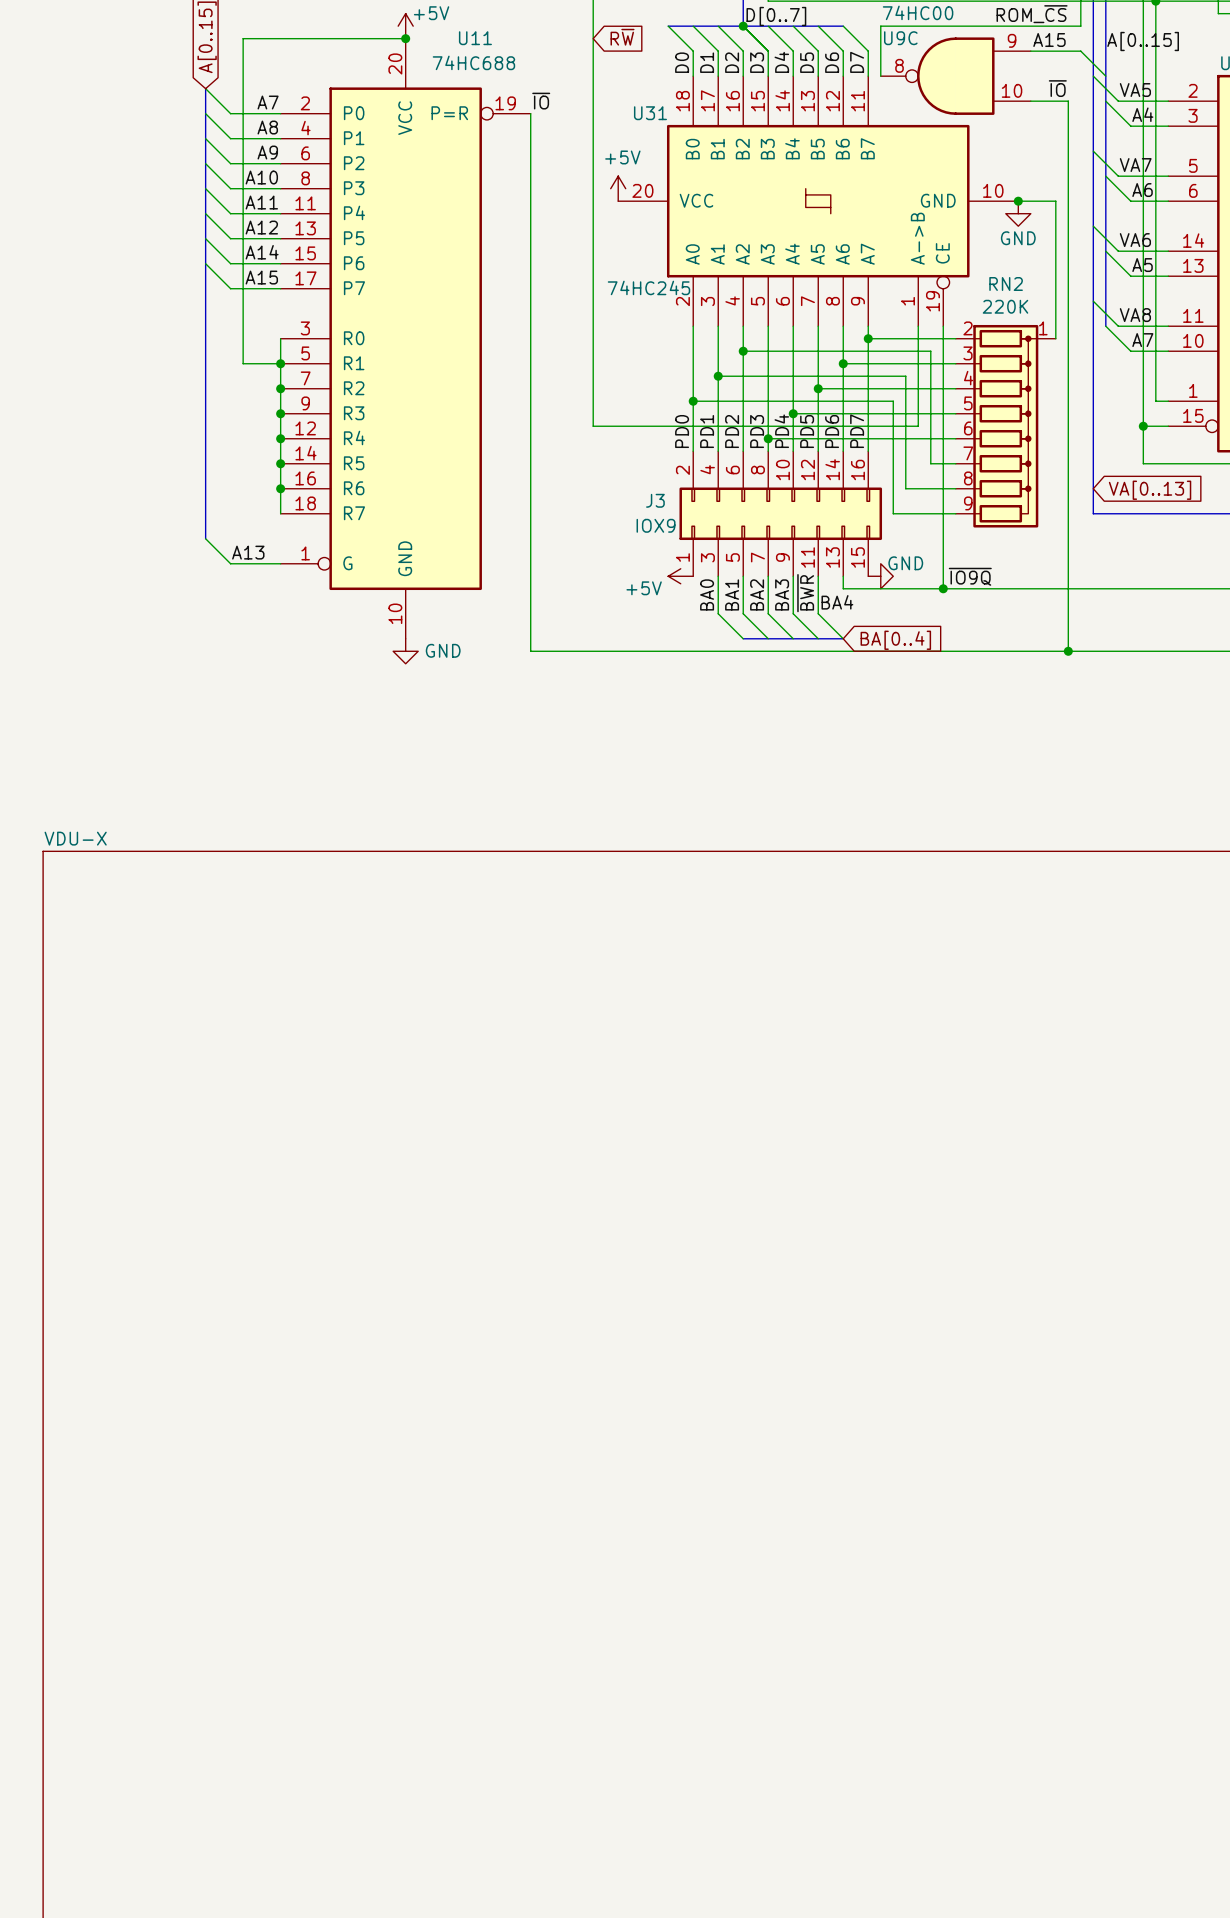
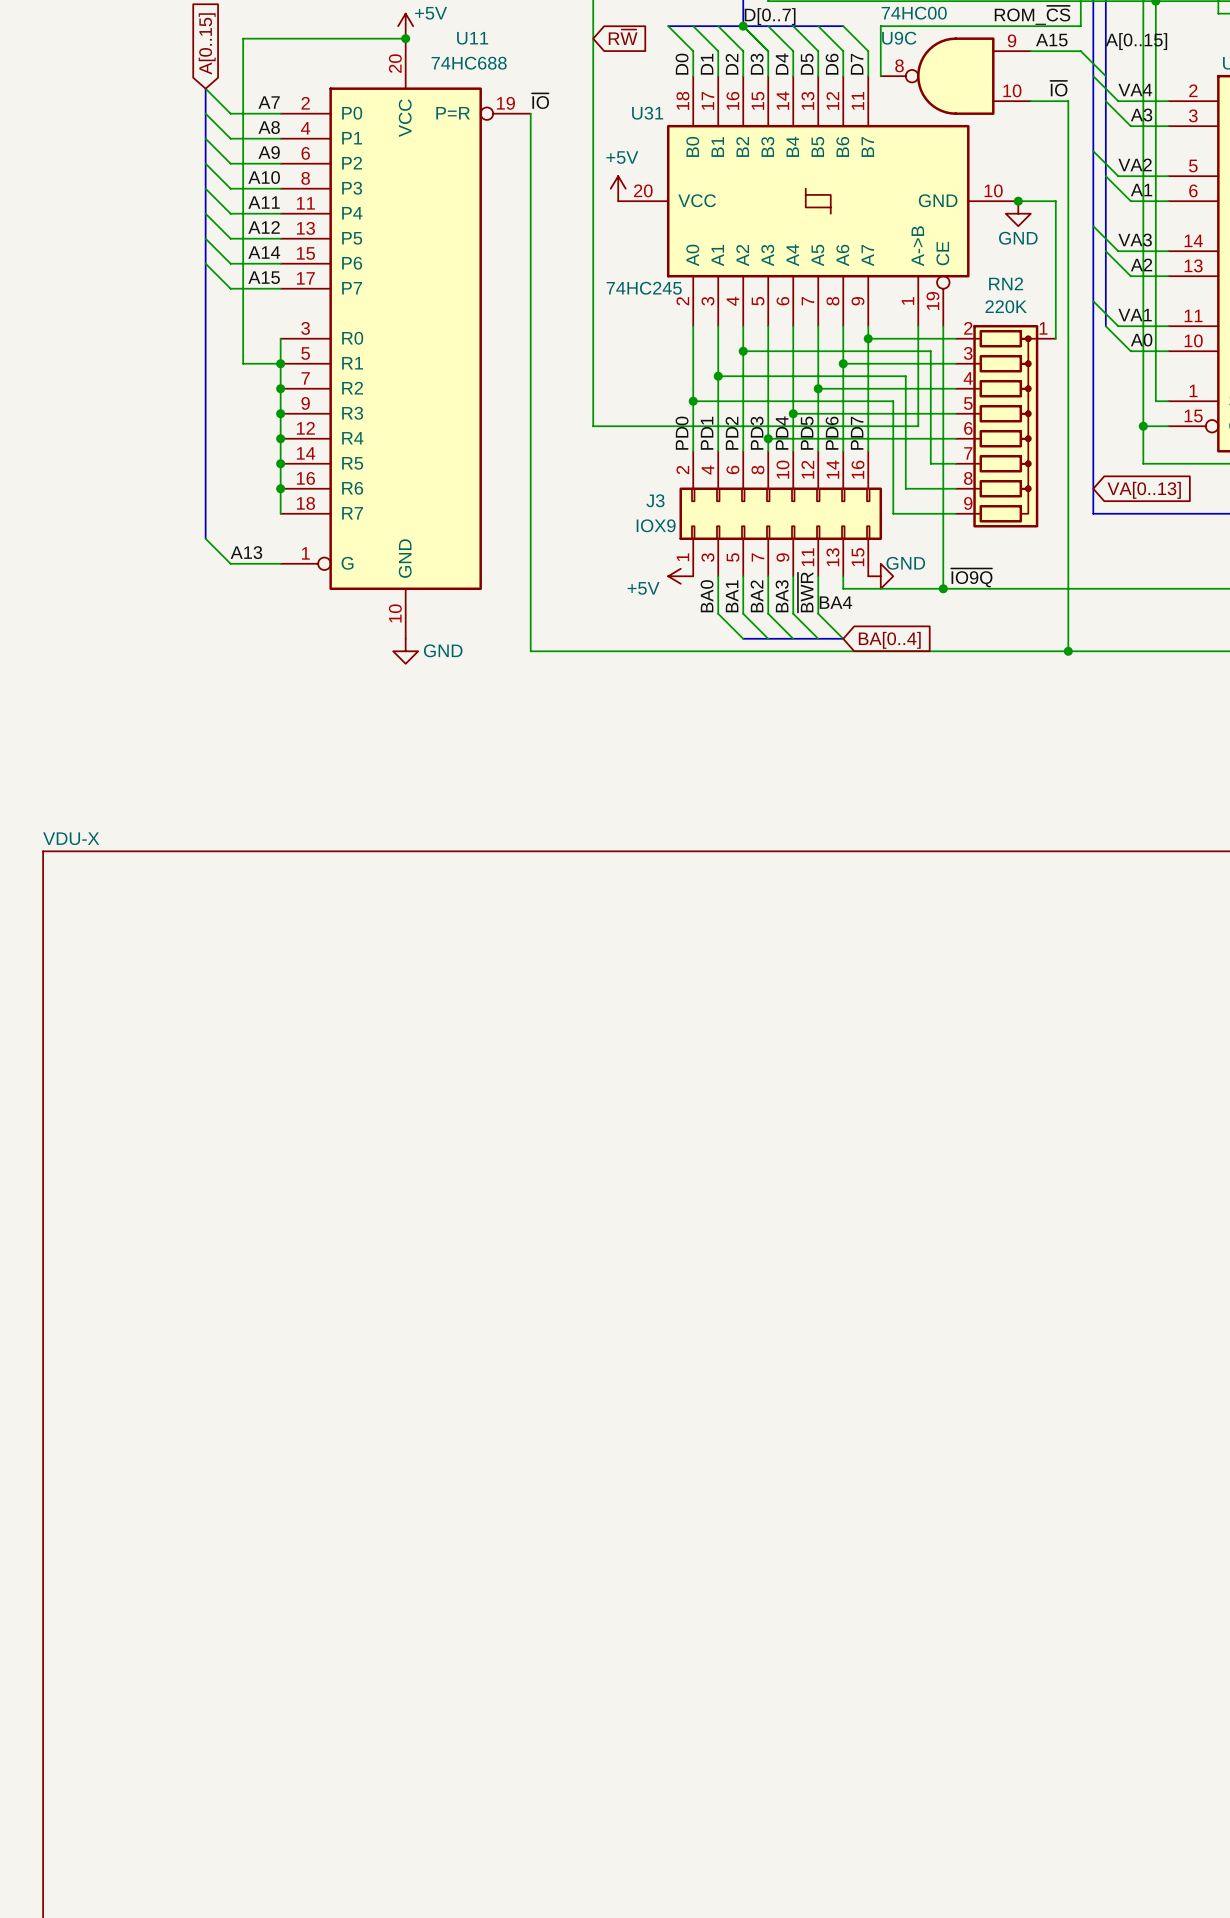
label: VA5 (1135, 90) -> VA4 (1135, 90)
label: A4 (1142, 114) -> A3 (1141, 115)
label: VA7 (1135, 165) -> VA2 (1135, 164)
label: A6 (1142, 190) -> A1 (1141, 190)
label: VA6 (1135, 240) -> VA3 (1135, 240)
label: A5 (1142, 265) -> A2 (1141, 264)
label: VA8 (1135, 315) -> VA1 (1135, 315)
label: A7 (1142, 340) -> A0 (1141, 340)

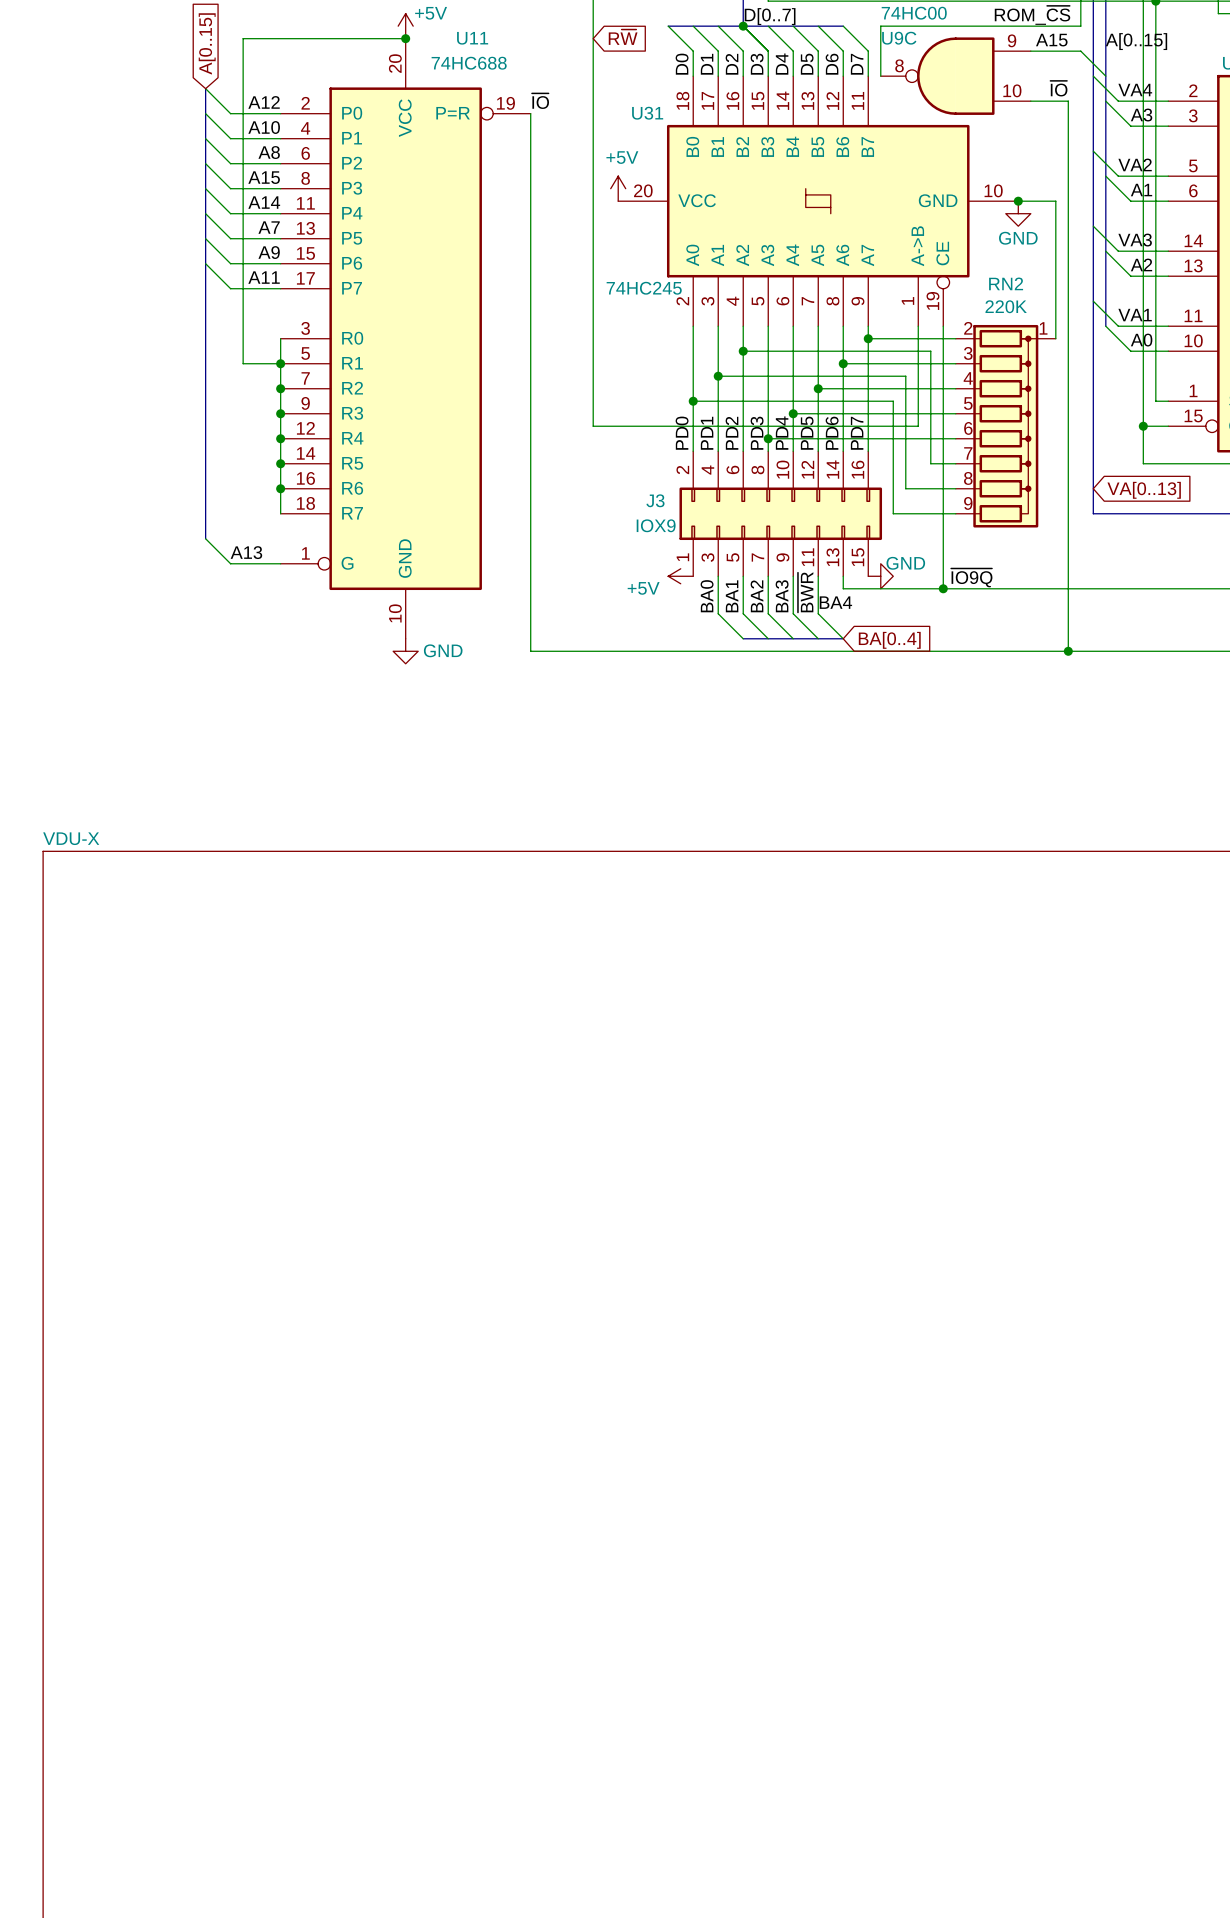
label: A7 (269, 102) -> A12 (264, 102)
label: A8 (269, 127) -> A10 (264, 127)
label: A9 (269, 152) -> A8 (269, 152)
label: A10 (264, 177) -> A15 (264, 177)
label: A11 (264, 202) -> A14 (264, 202)
label: A12 (264, 227) -> A7 (269, 227)
label: A14 (264, 252) -> A9 (269, 252)
label: A15 (264, 277) -> A11 (264, 277)

